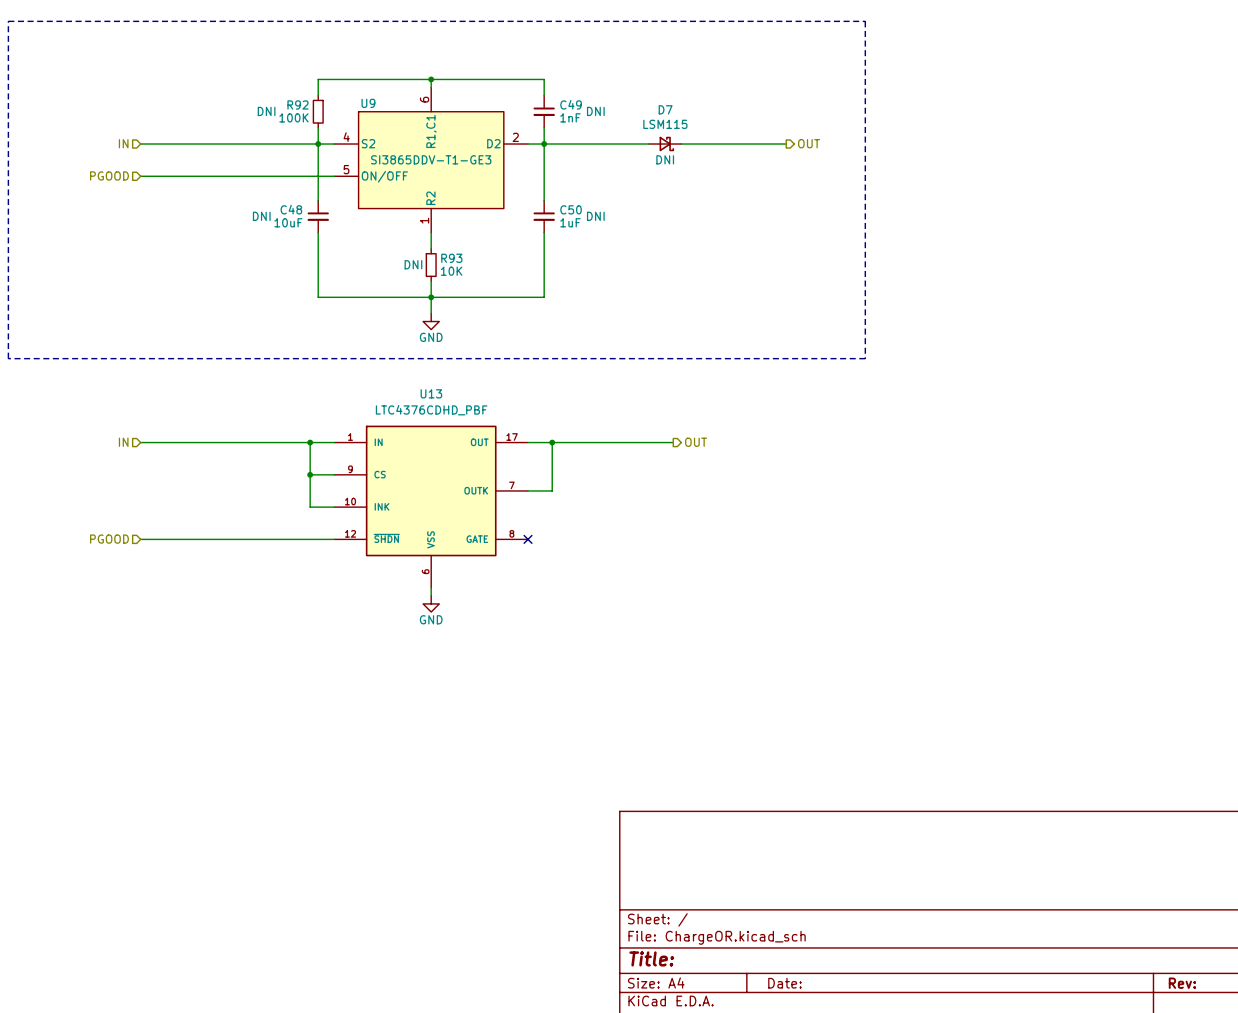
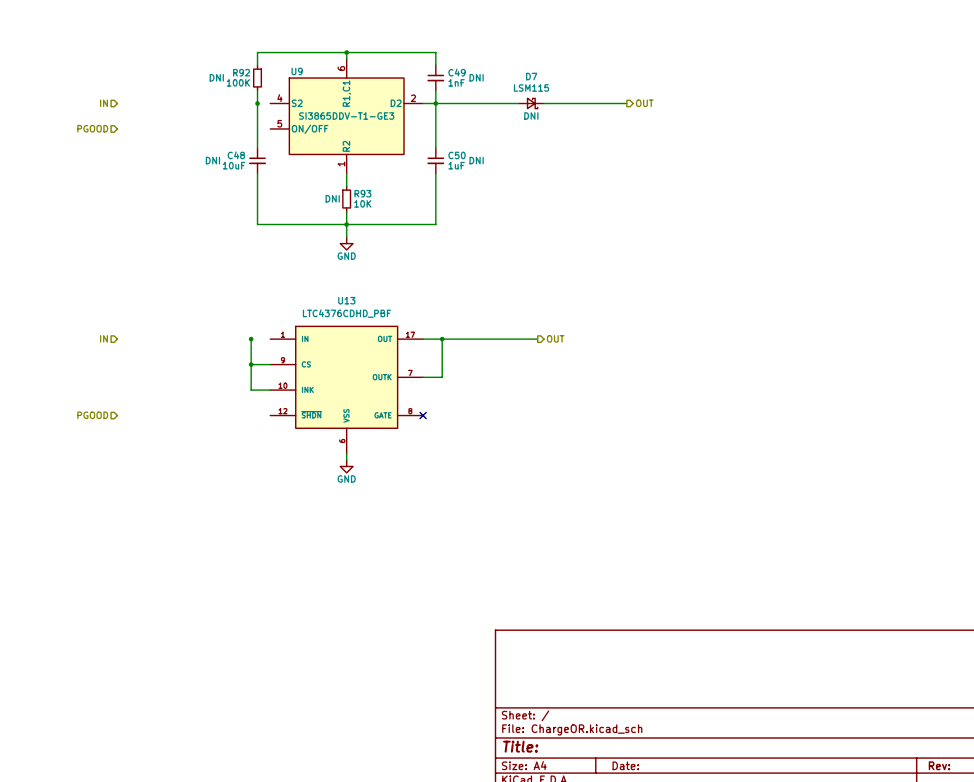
line: (8, 21) (865, 21) (865, 358) (8, 358) (8, 21) -> none
wire: (140, 144) (334, 144) -> none
wire: (140, 176) (334, 176) -> none
wire: (140, 442) (334, 442) -> none
wire: (140, 539) (334, 539) -> none

